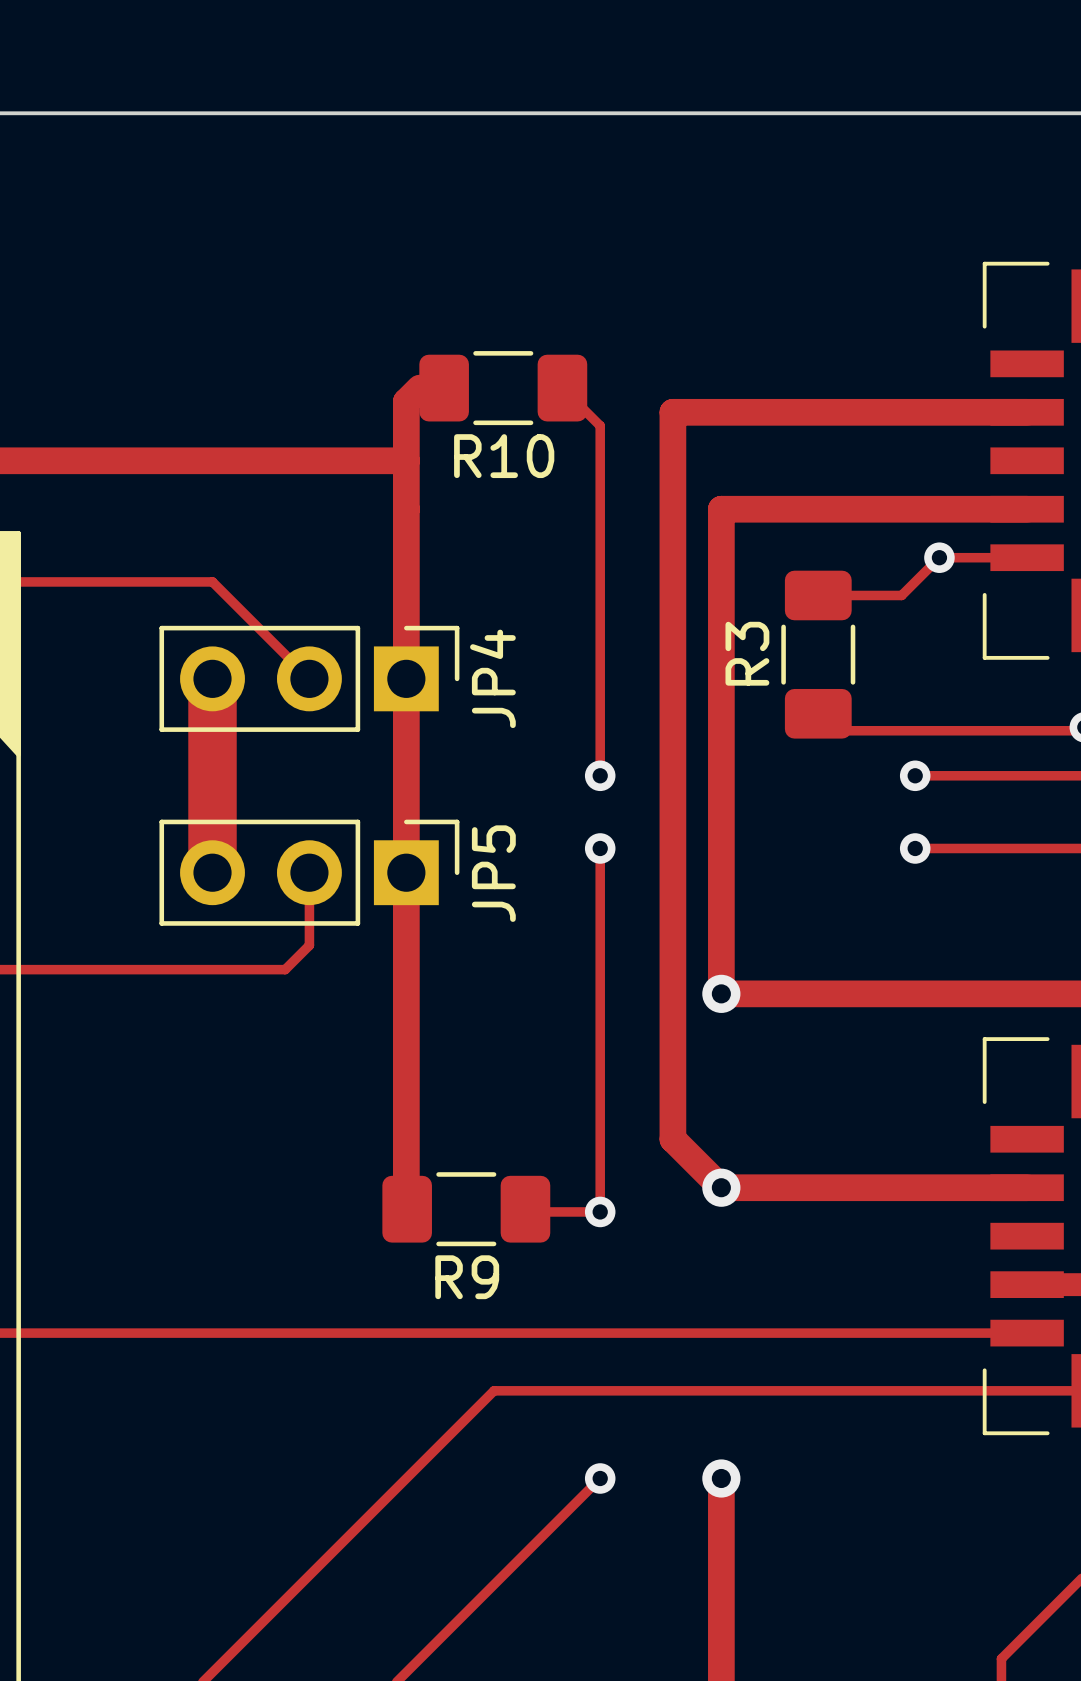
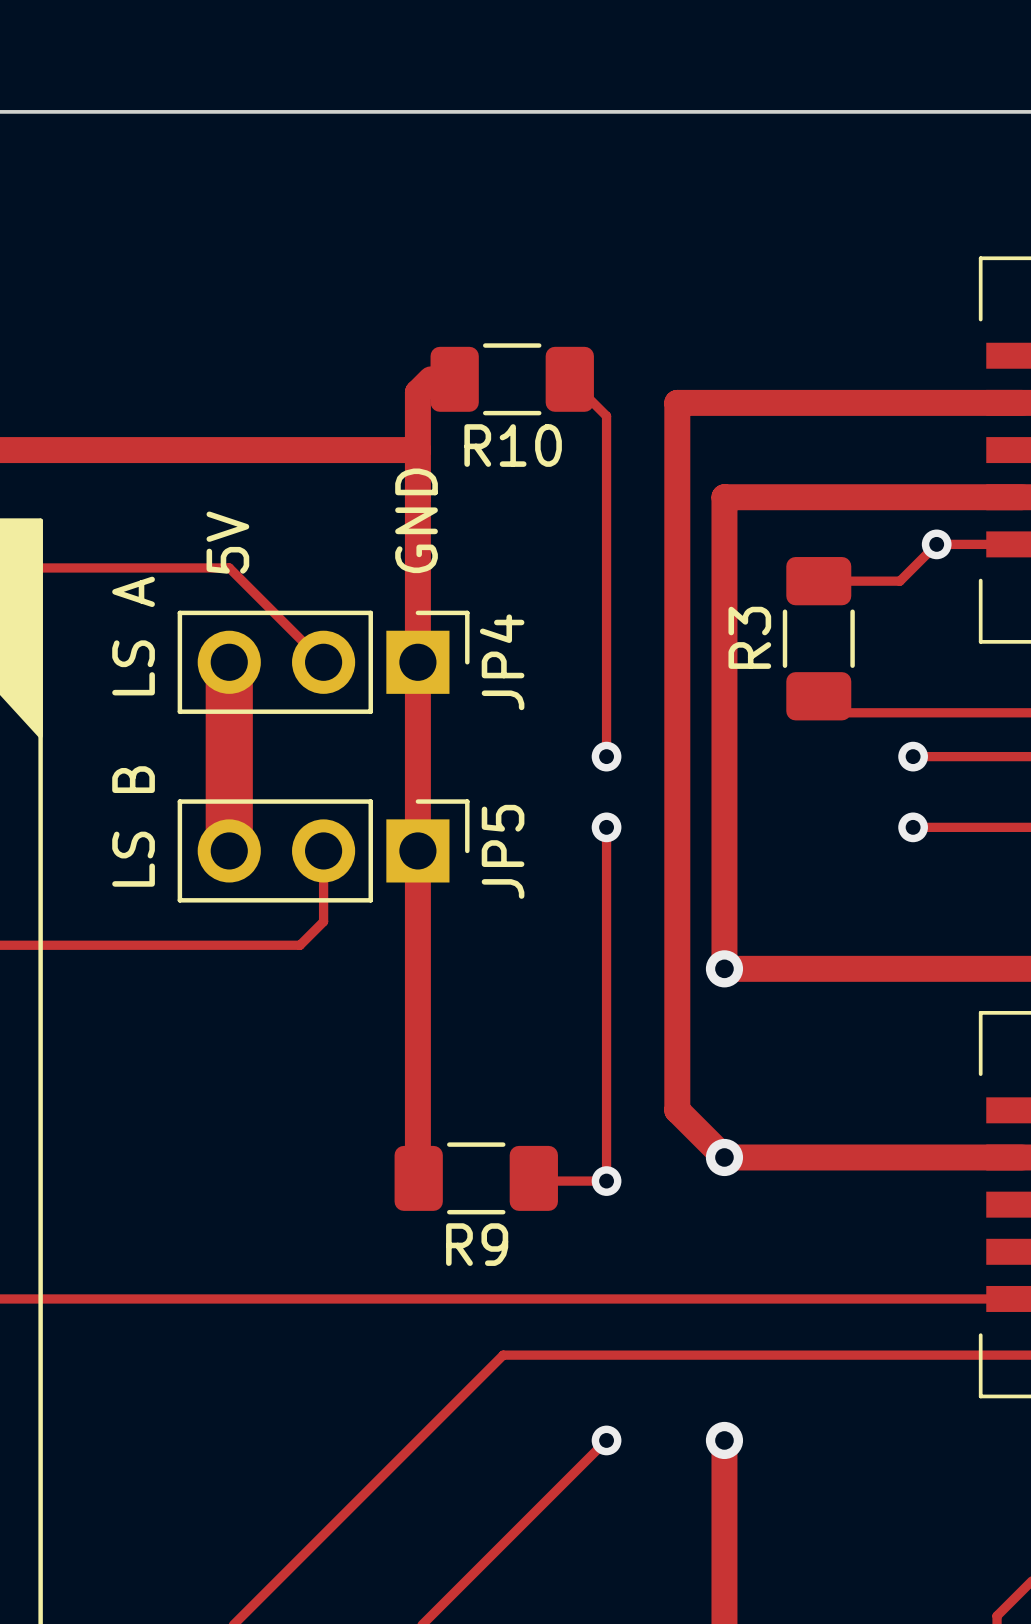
text: none -> GND (416, 520)
text: none -> 5V (227, 542)
text: none -> LS A (133, 636)
text: none -> LS B (133, 826)

